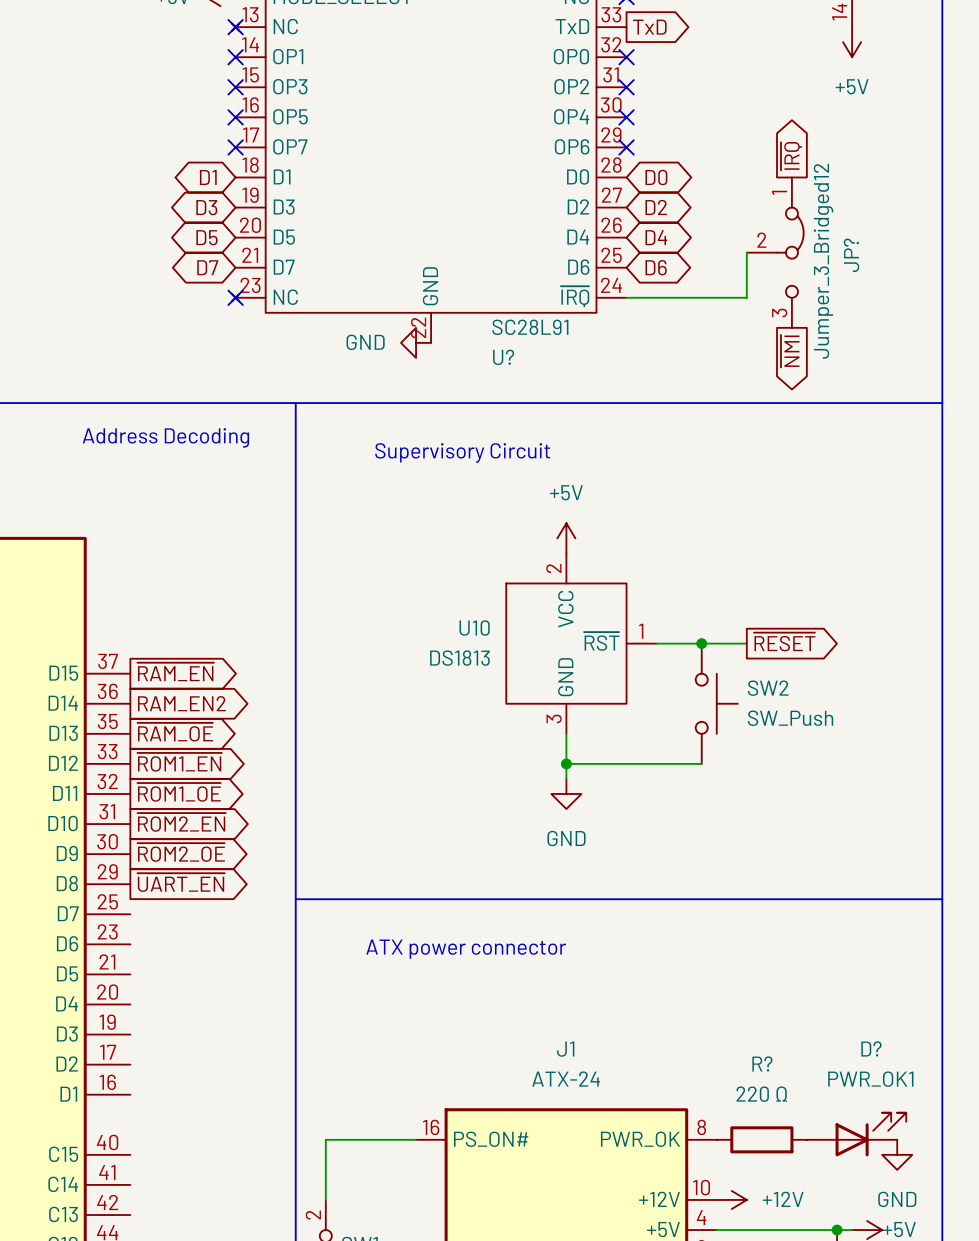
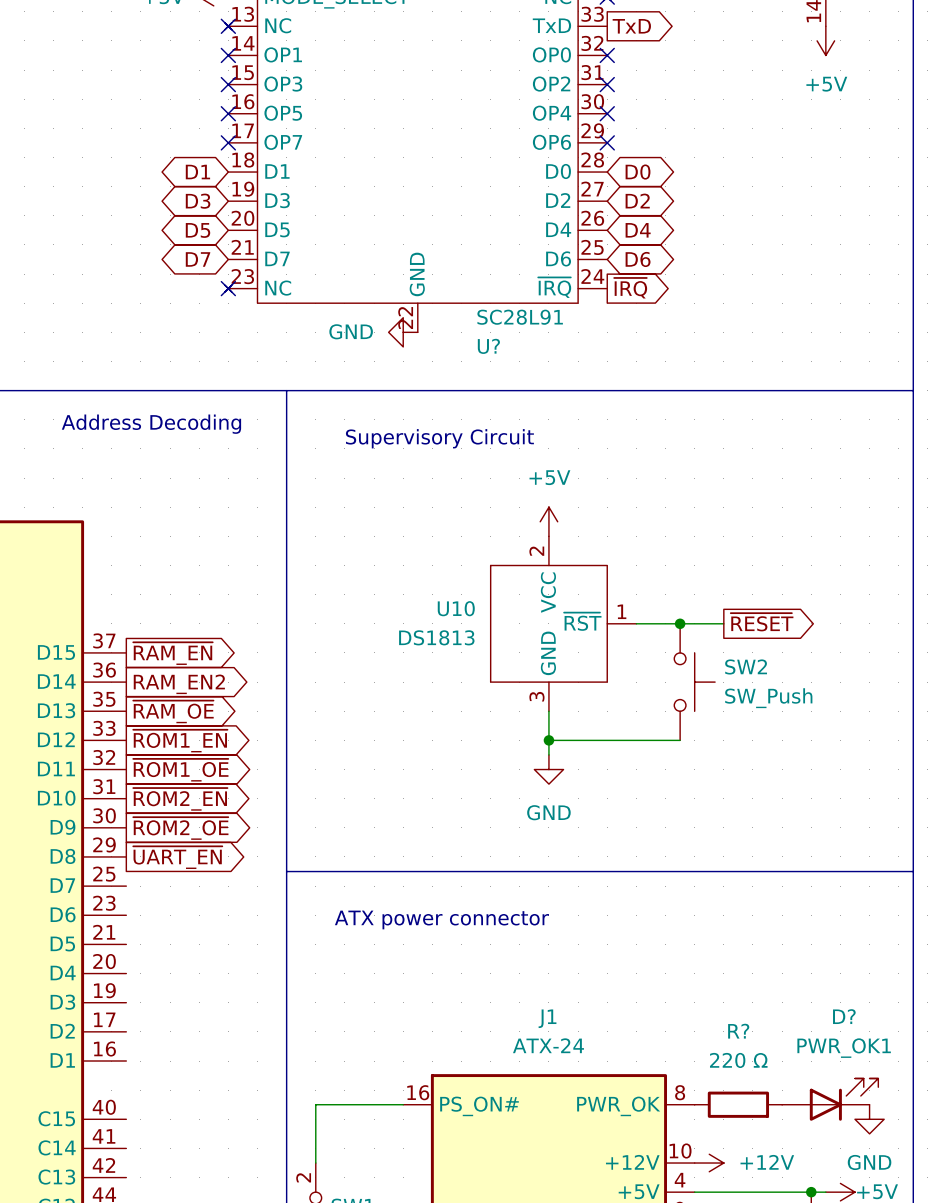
global label rotation: 0° (791, 156) -> 90° clockwise (630, 288)
global label position: ~{IRQ} (791, 156) -> ~{IRQ} (630, 288)
wire: (746, 252) (746, 297) (626, 297) -> none
JP?: Jumper_3_Bridged12 (775, 252) -> none
global label: ~{NMI} (790, 351) -> none

